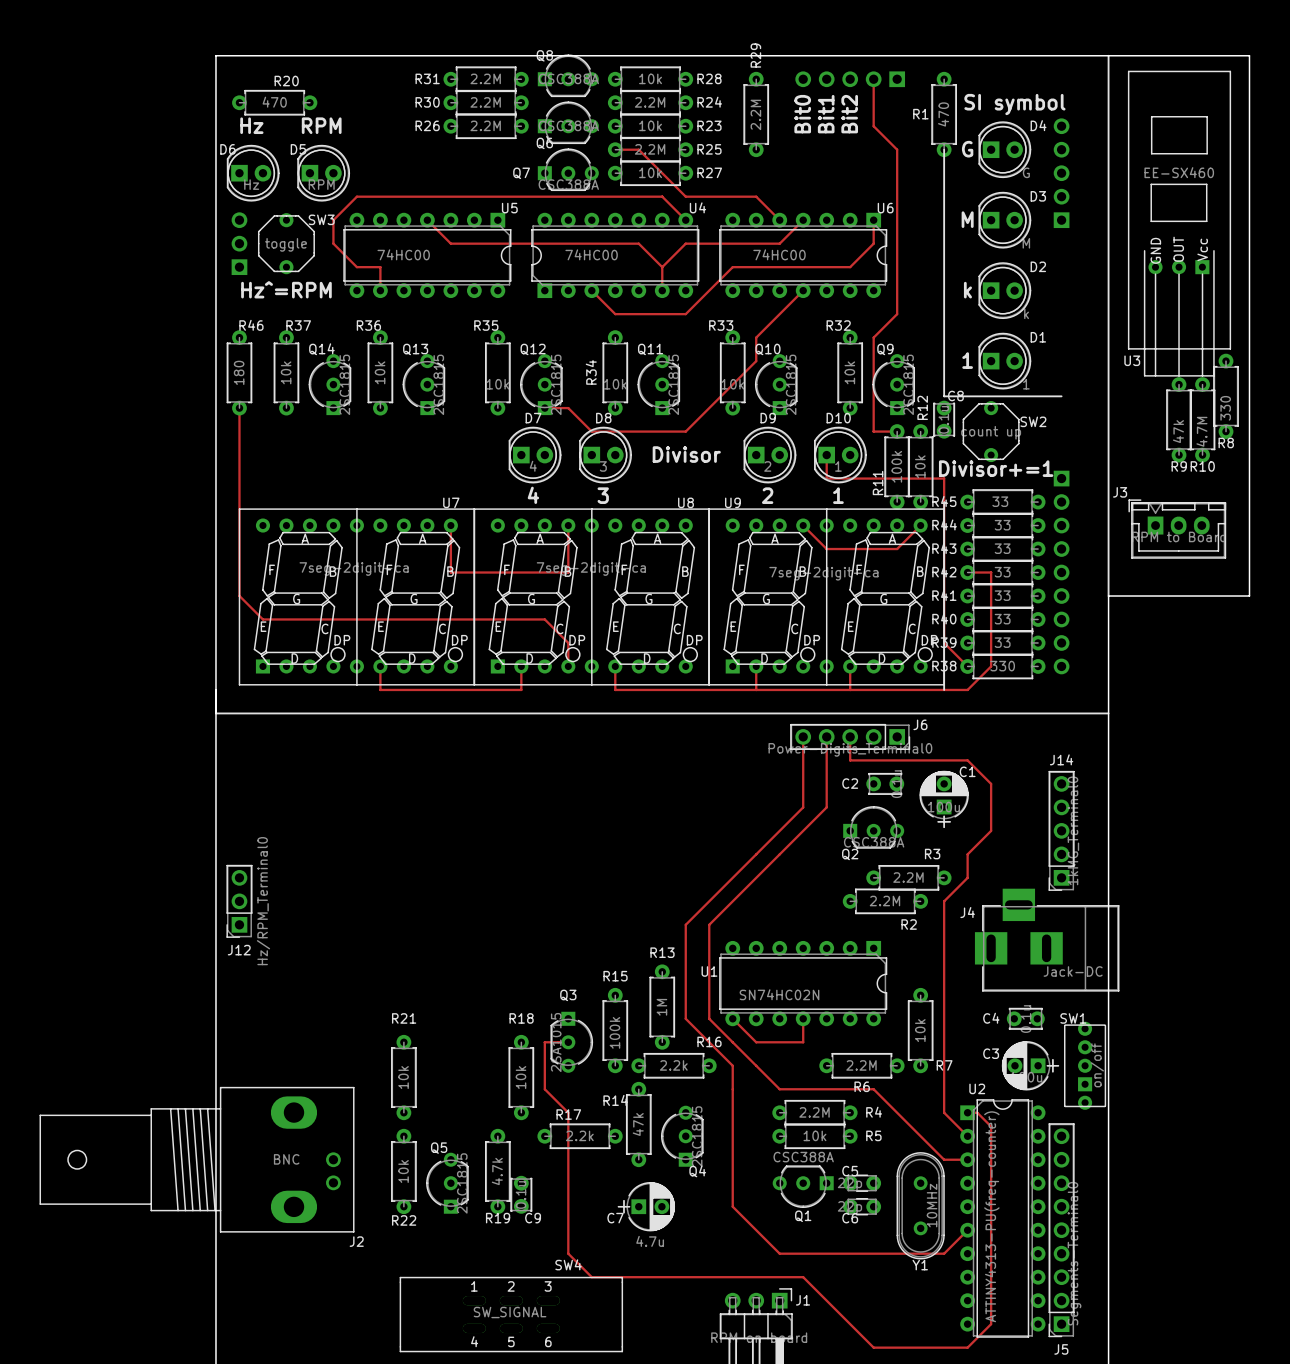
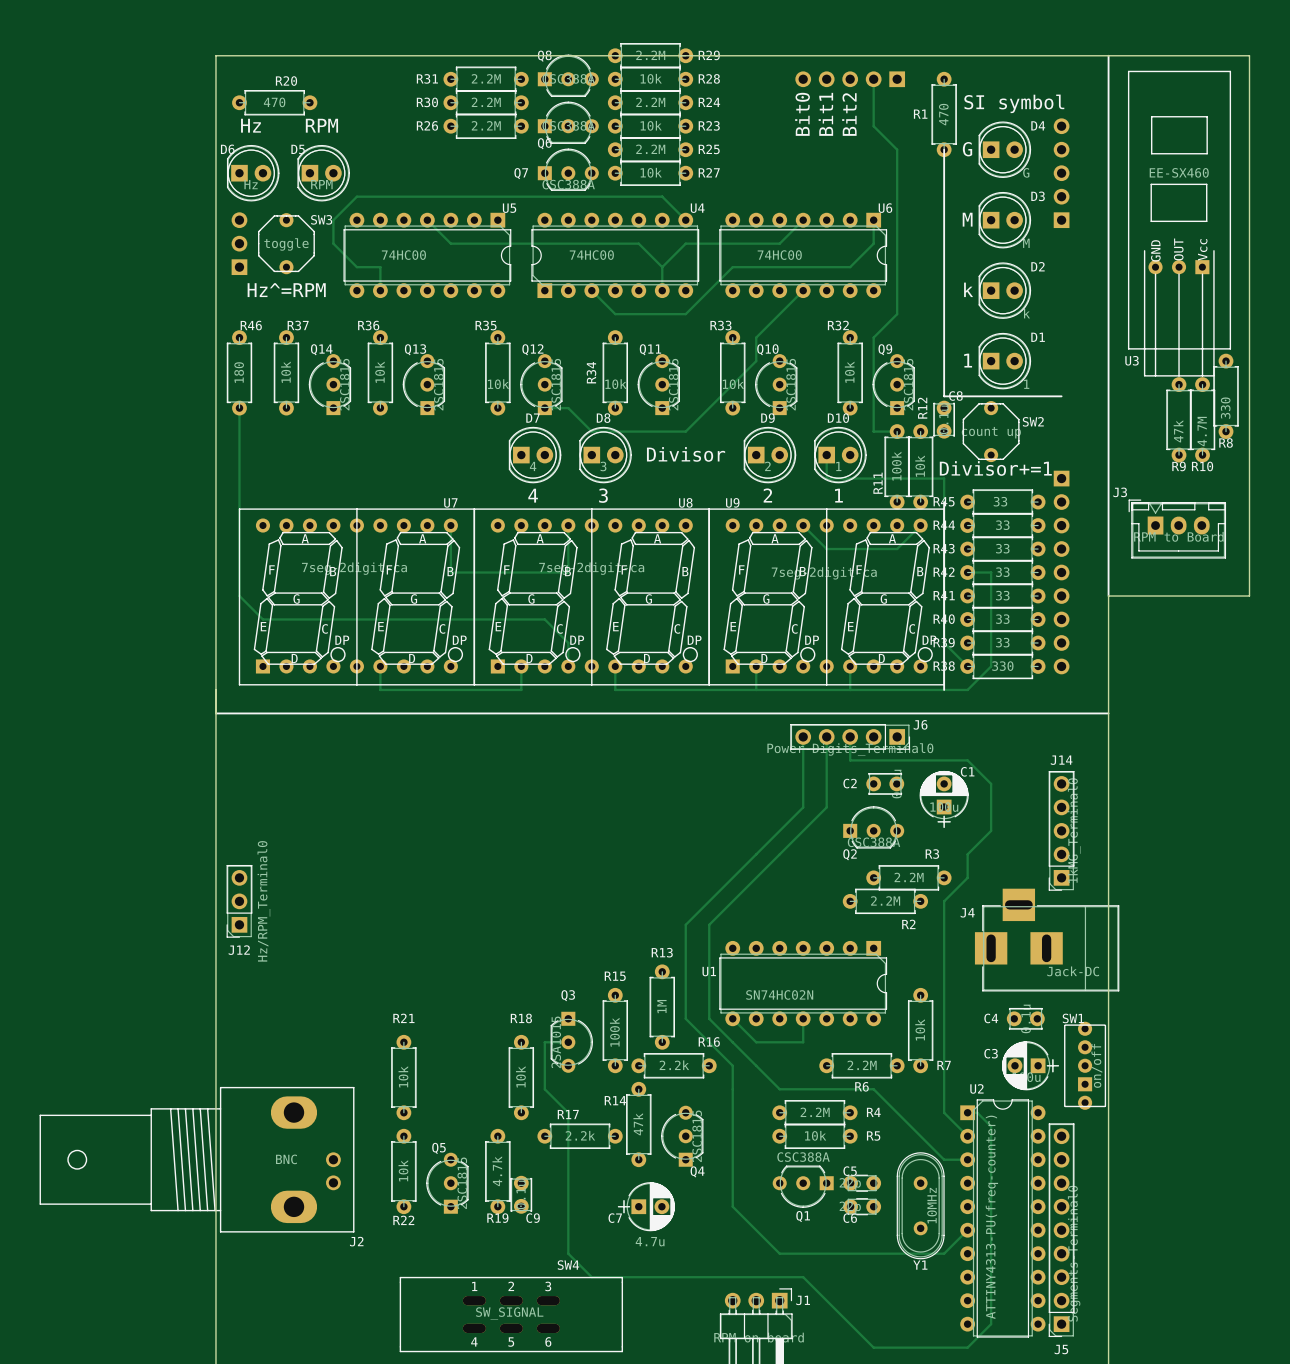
R29 rotation: 0° (756, 114) -> 90° clockwise (650, 55)
R29 position: (756, 114) -> (650, 55)
track: (615, 149) (638, 149) (685, 196) (756, 196) (779, 220) -> none

